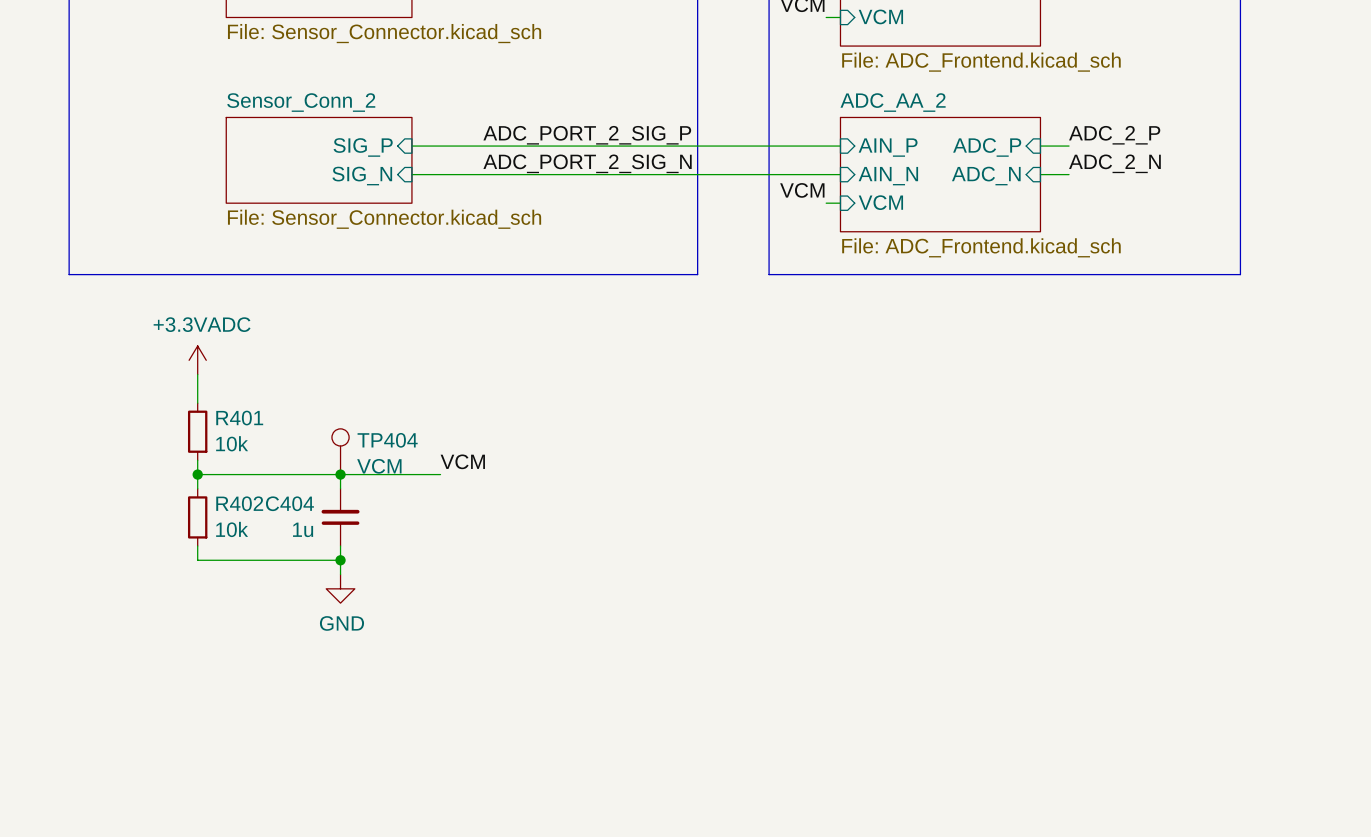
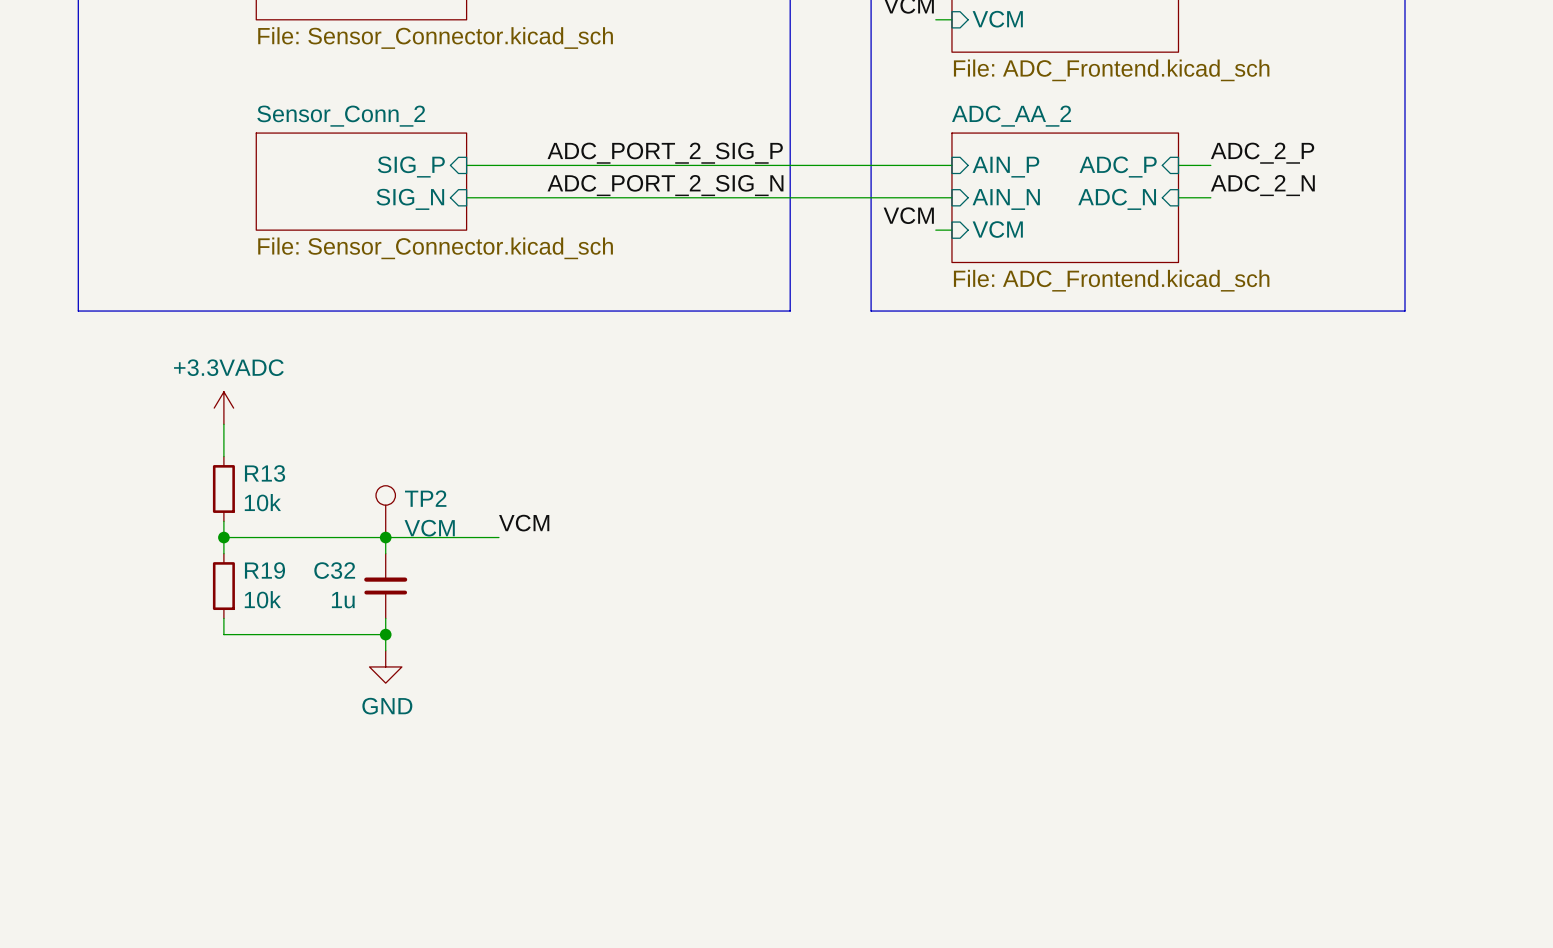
R401 name: R401 (239, 418) -> R13 (265, 473)
TP404 name: TP404 (387, 440) -> TP2 (425, 498)
R402 name: R402 (239, 503) -> R19 (264, 570)
C404 name: C404 (289, 503) -> C32 (334, 570)

